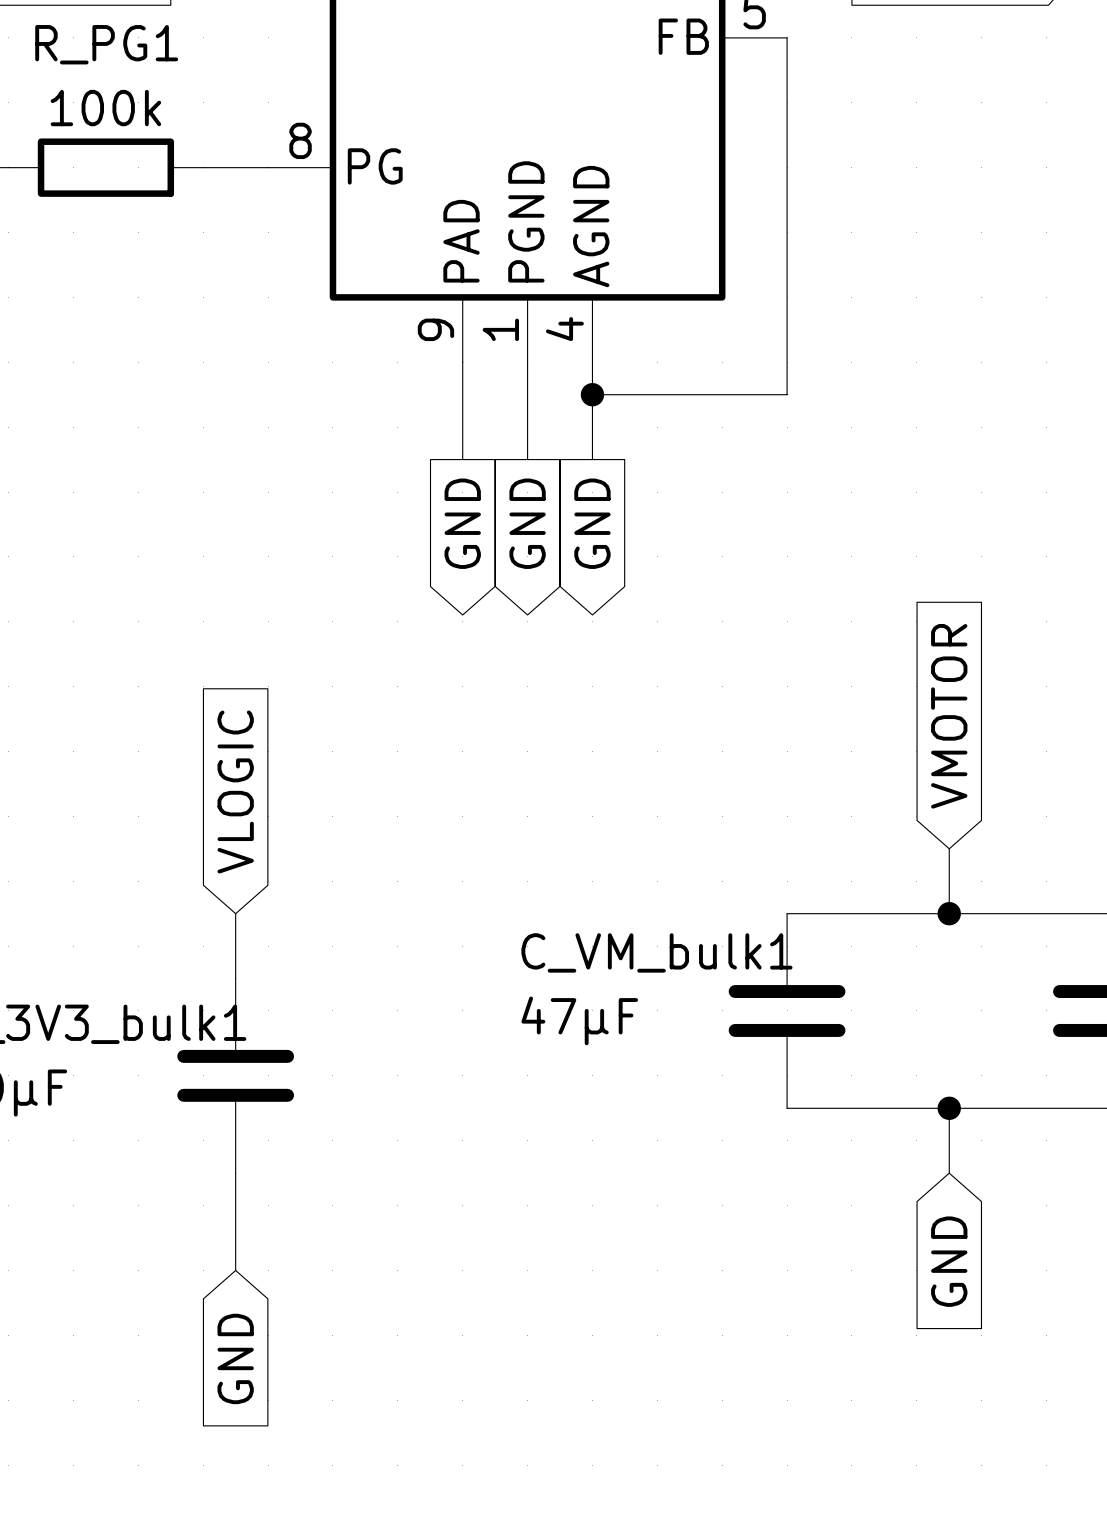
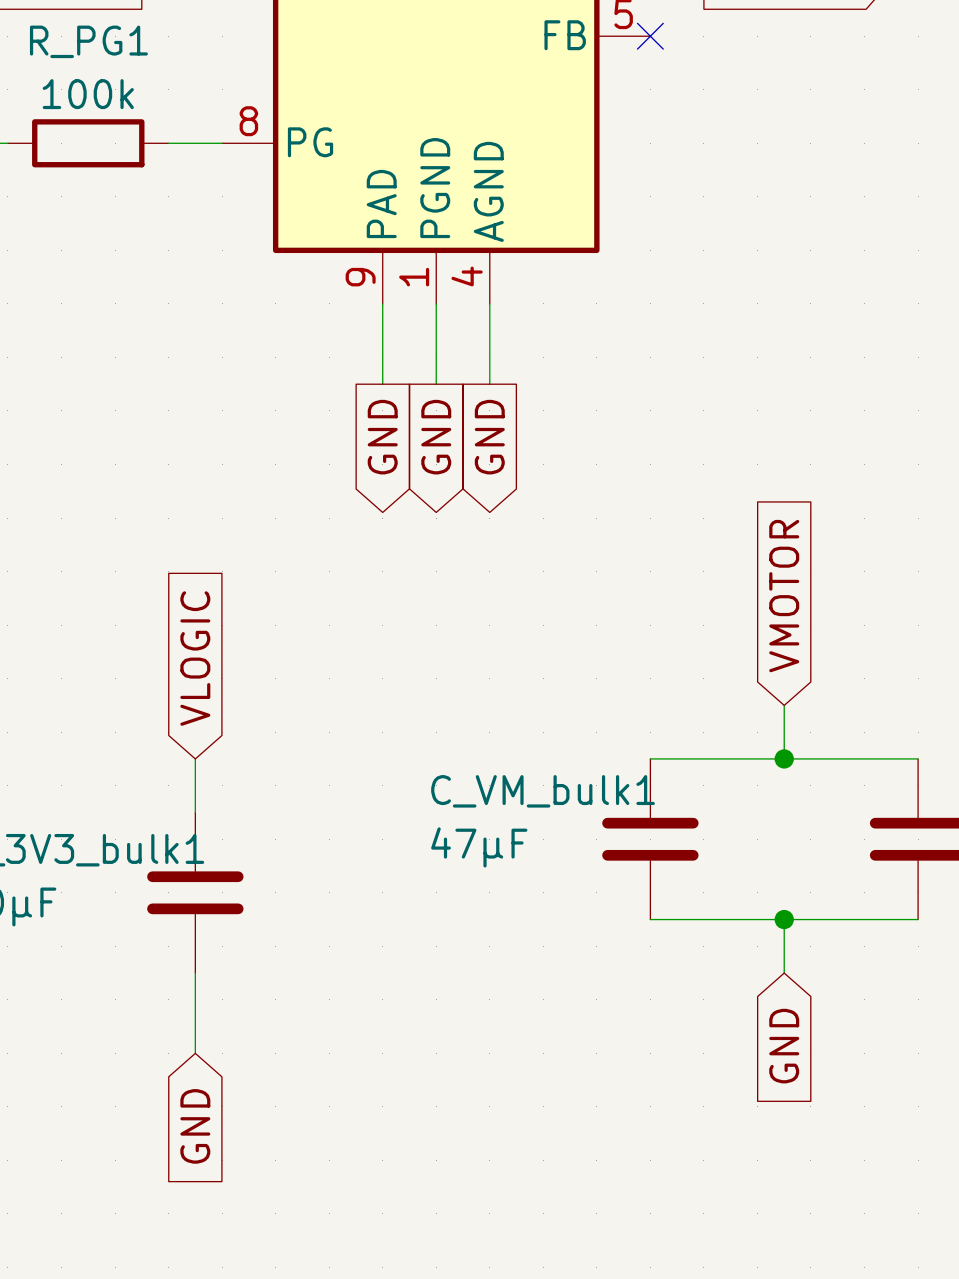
wire: (787, 37) (787, 394) (592, 394) -> none
no-connect mark: none -> (650, 36)
junction: (592, 394) -> none

